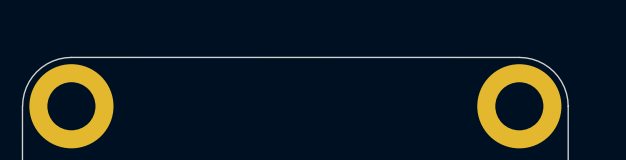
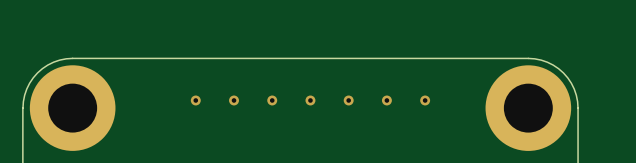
via: none -> (195, 100)
via: none -> (234, 100)
via: none -> (272, 100)
via: none -> (310, 100)
via: none -> (348, 100)
via: none -> (386, 100)
via: none -> (425, 100)

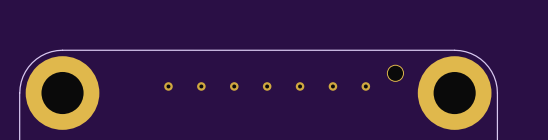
part: none -> (395, 73)

